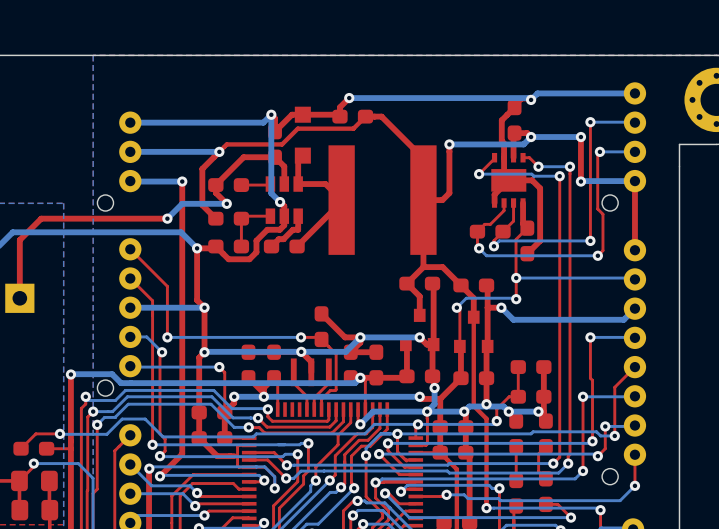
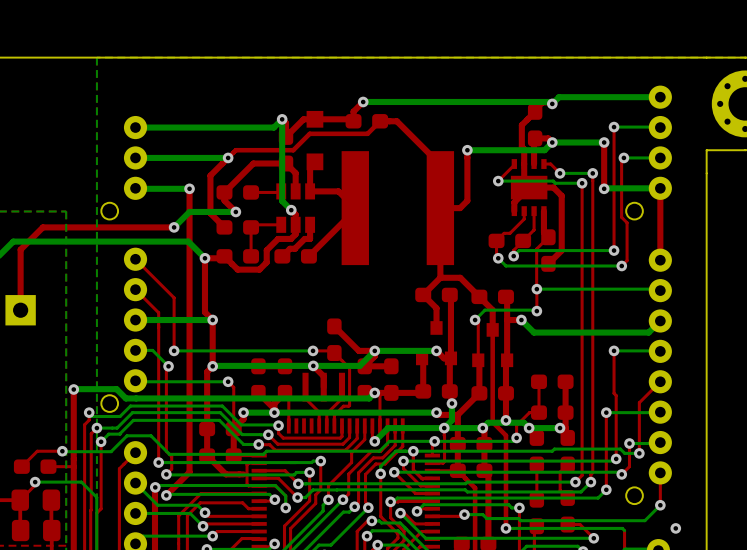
via: none -> (675, 528)
via: (600, 510) -> none

